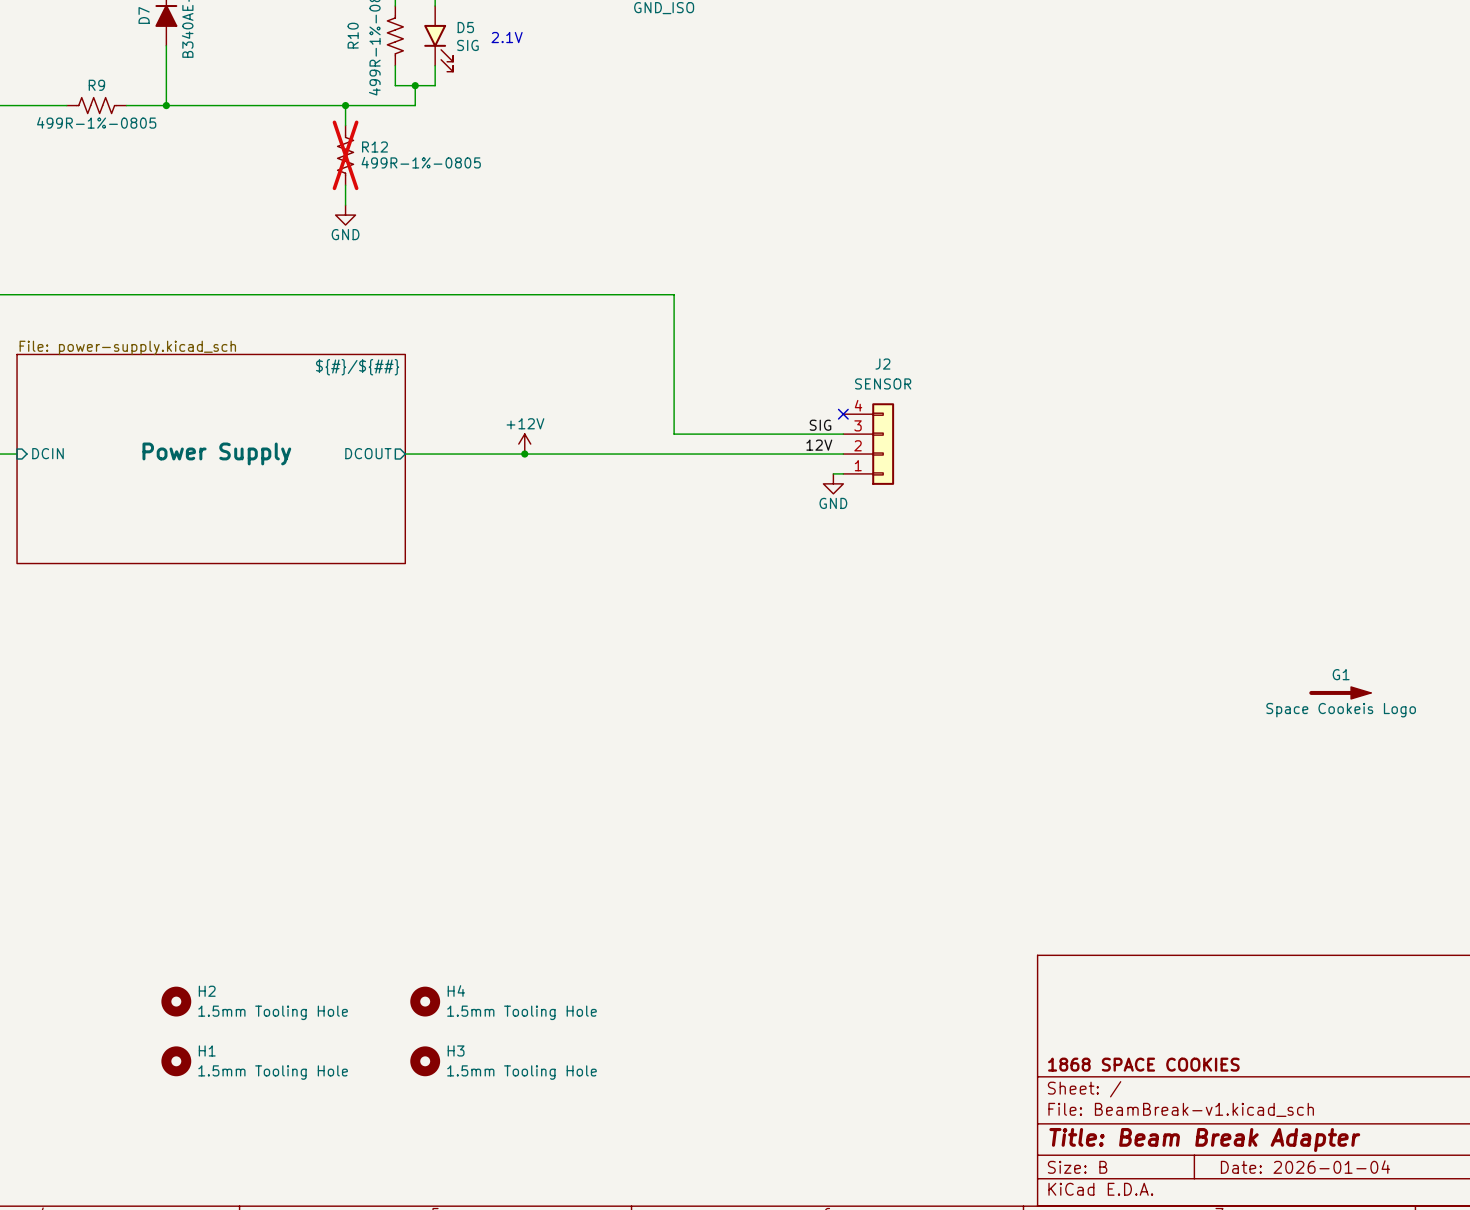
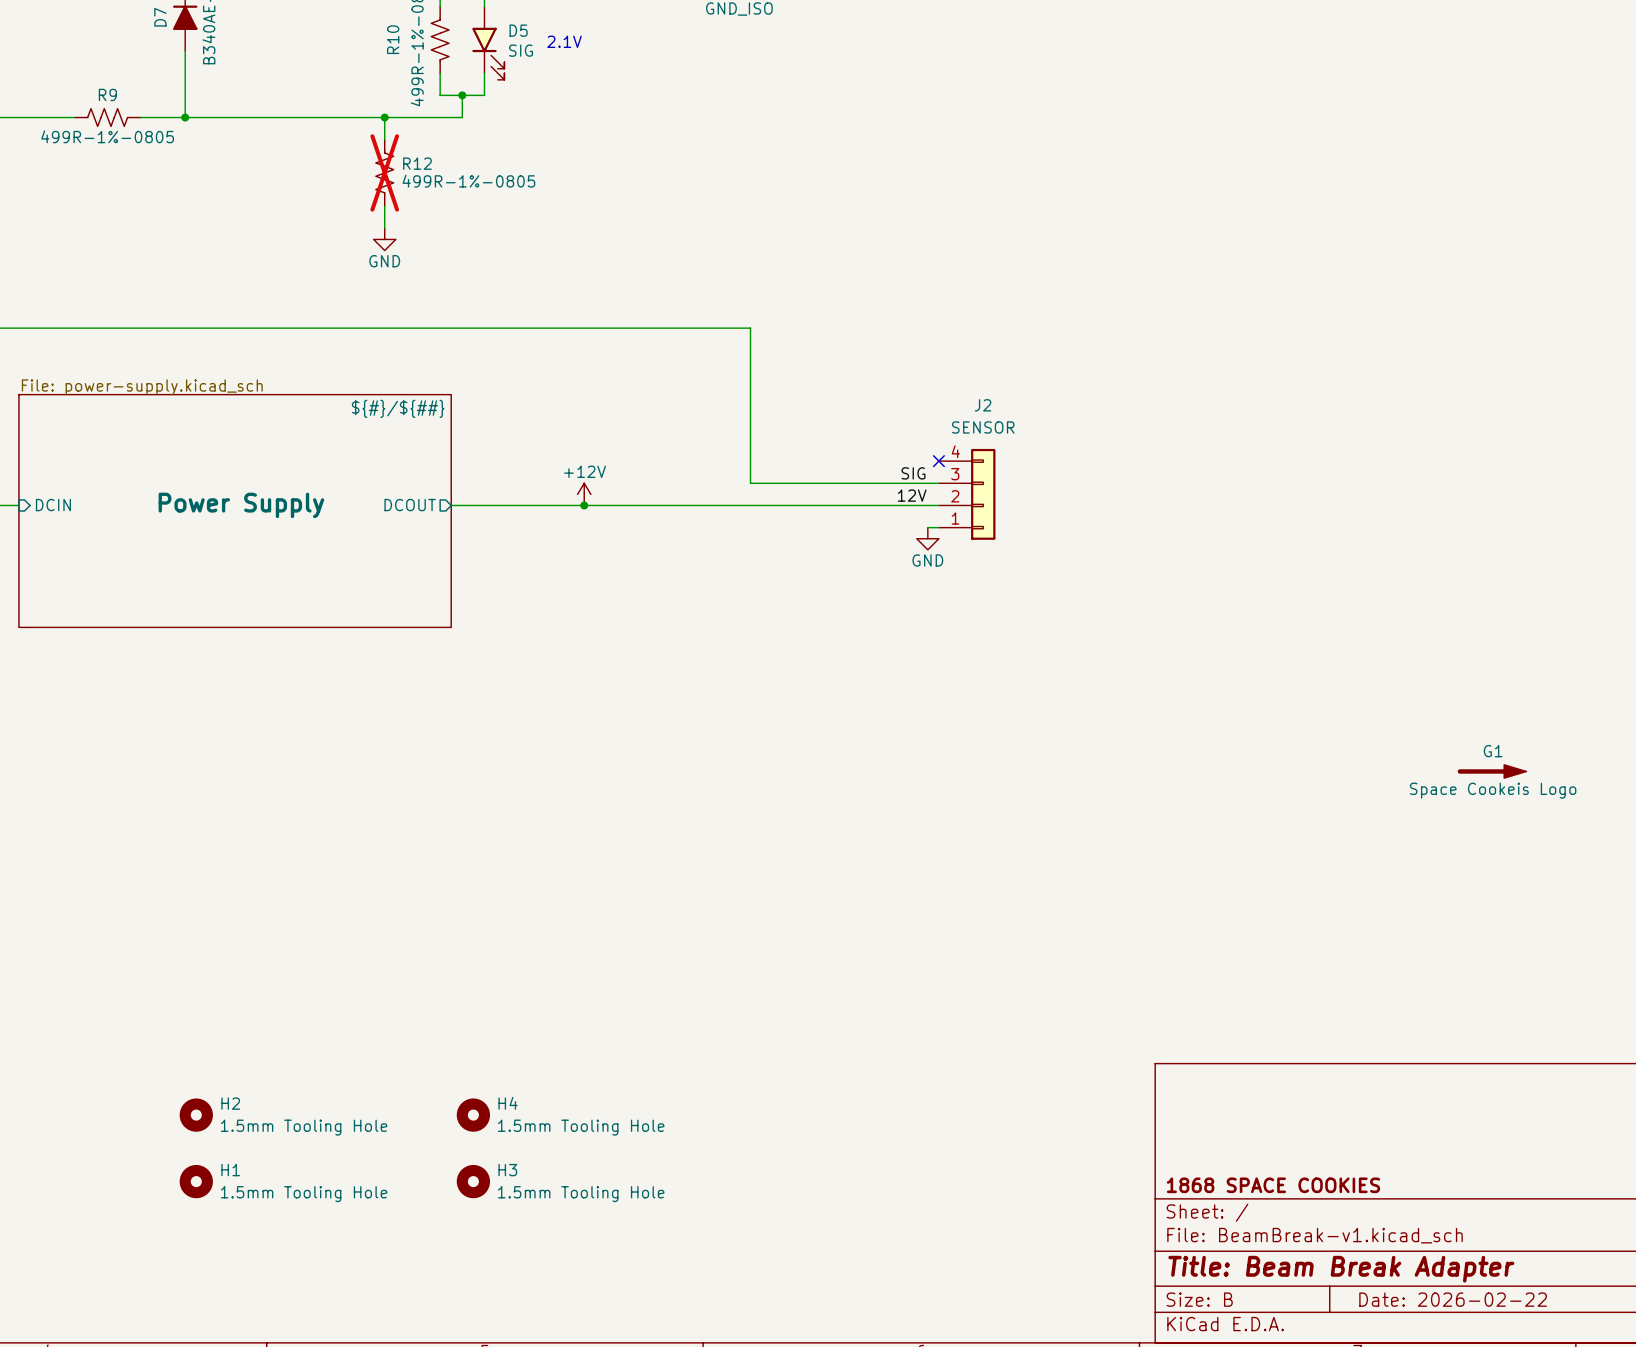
title block: Date: 2026-01-04 (1305, 1167) -> Date: 2026-02-22 (1453, 1299)

